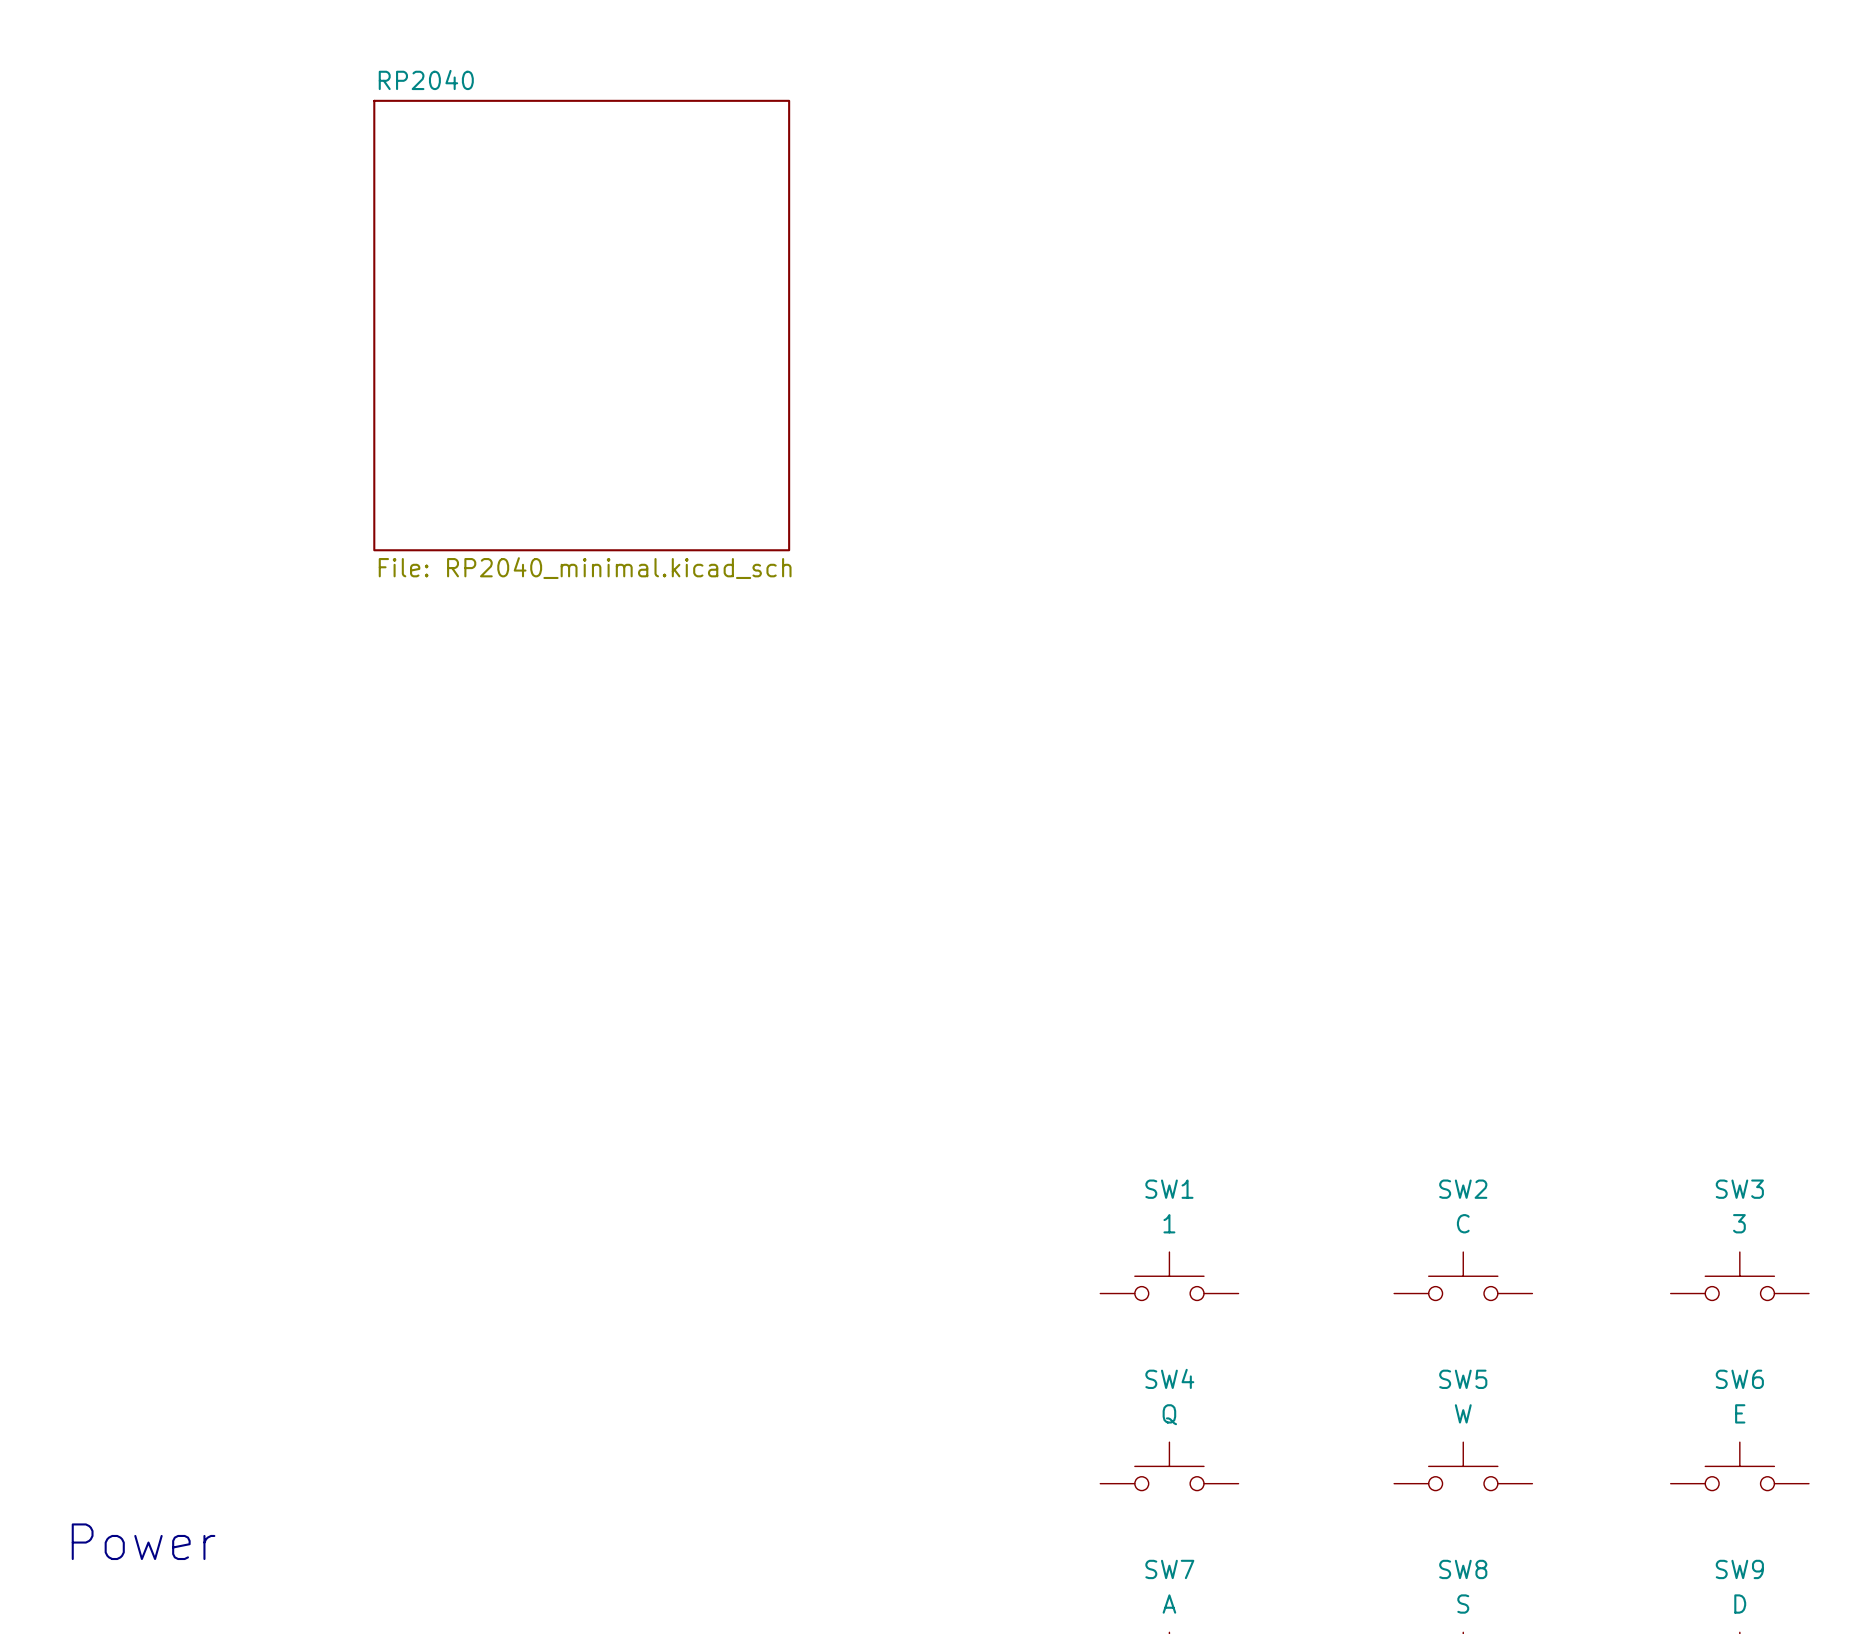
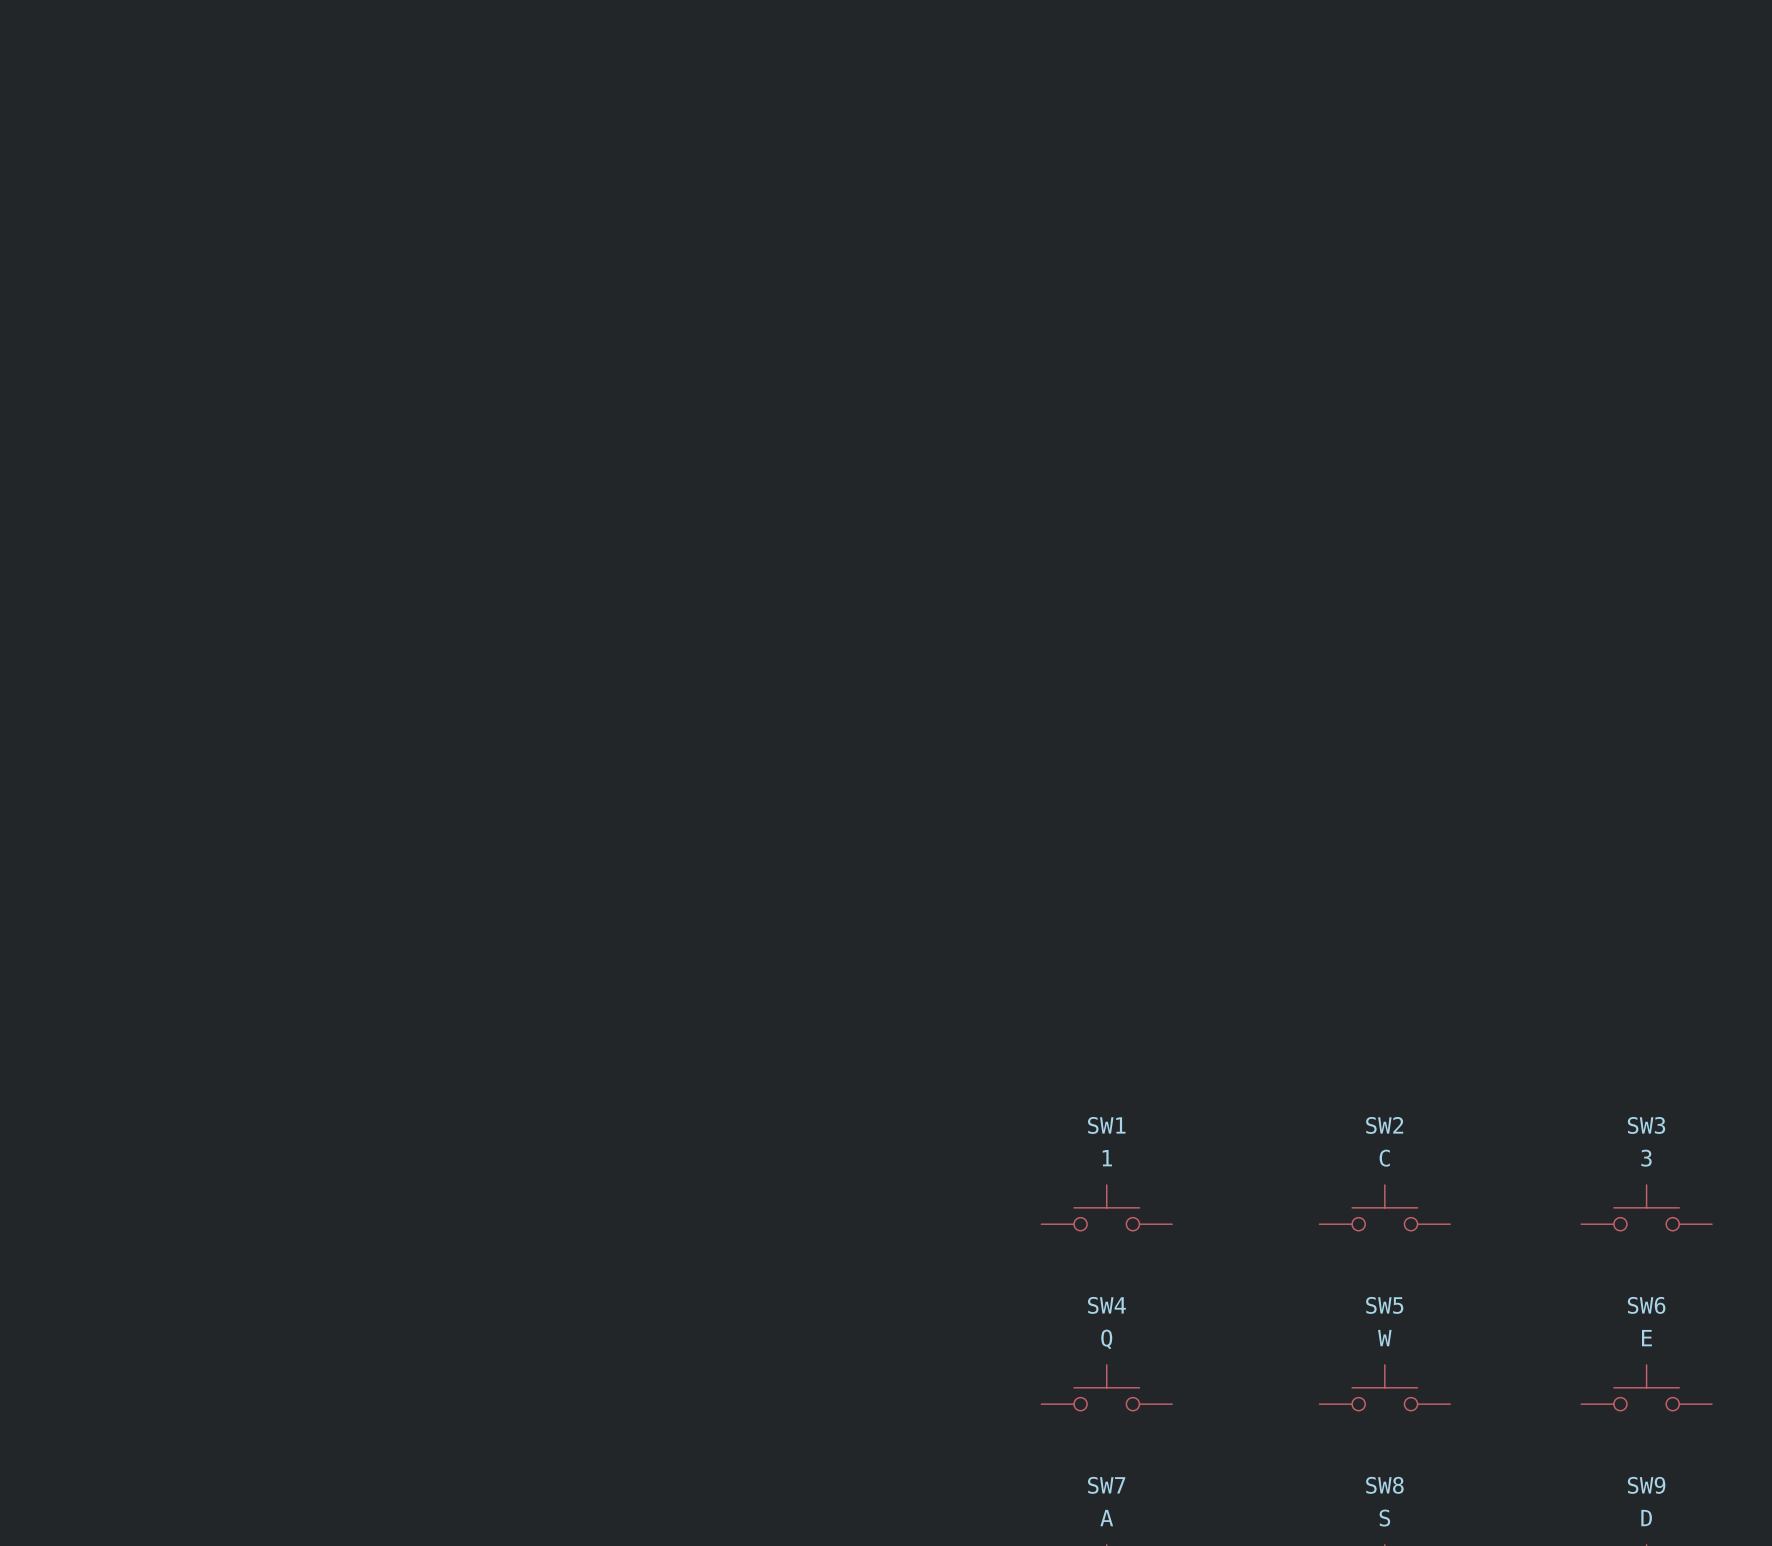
sheet RP2040: File: RP2040_minimal.kicad_sch (581, 325) -> none
text: Power (143, 1541) -> none

